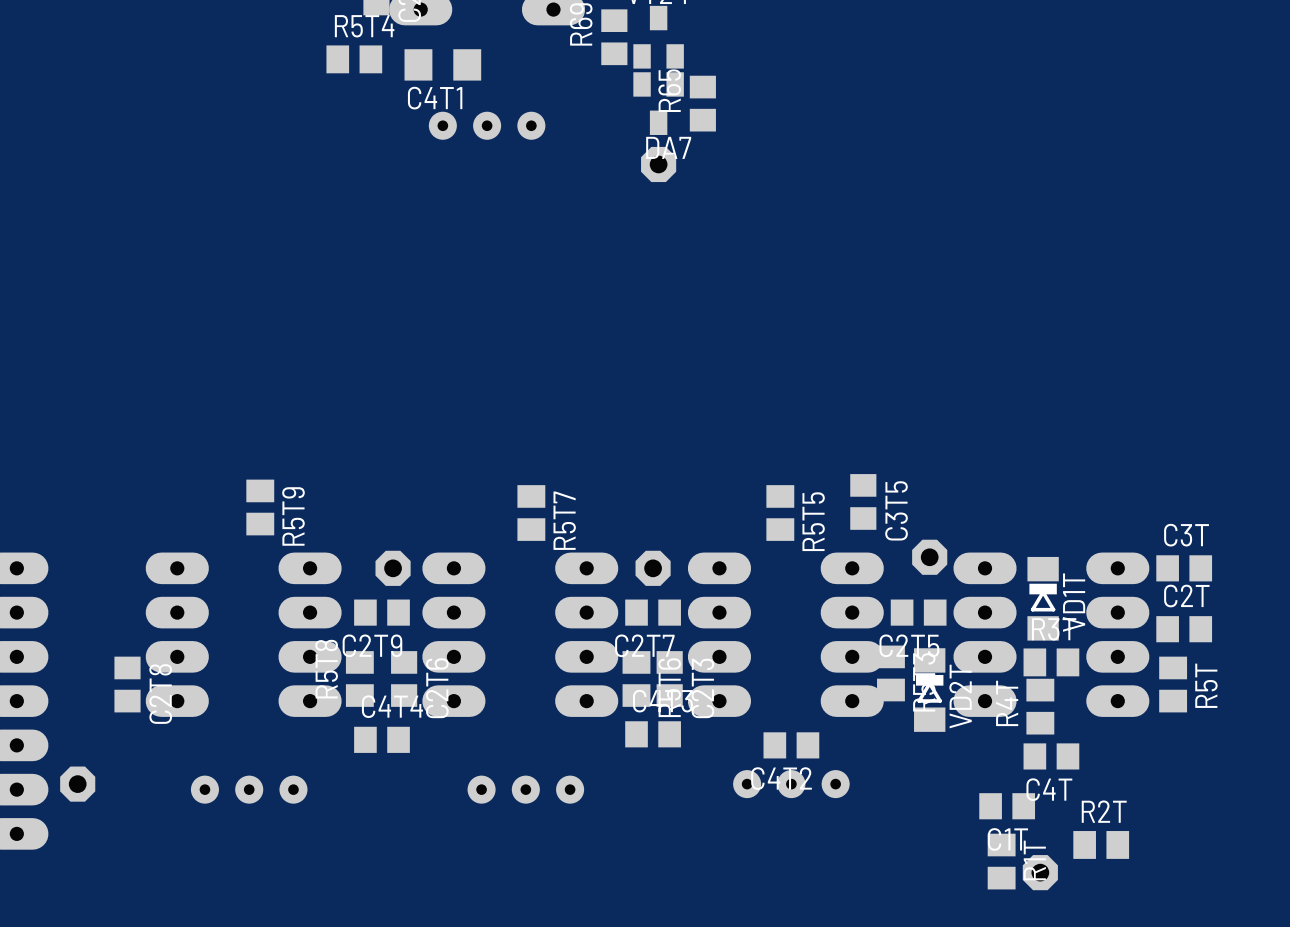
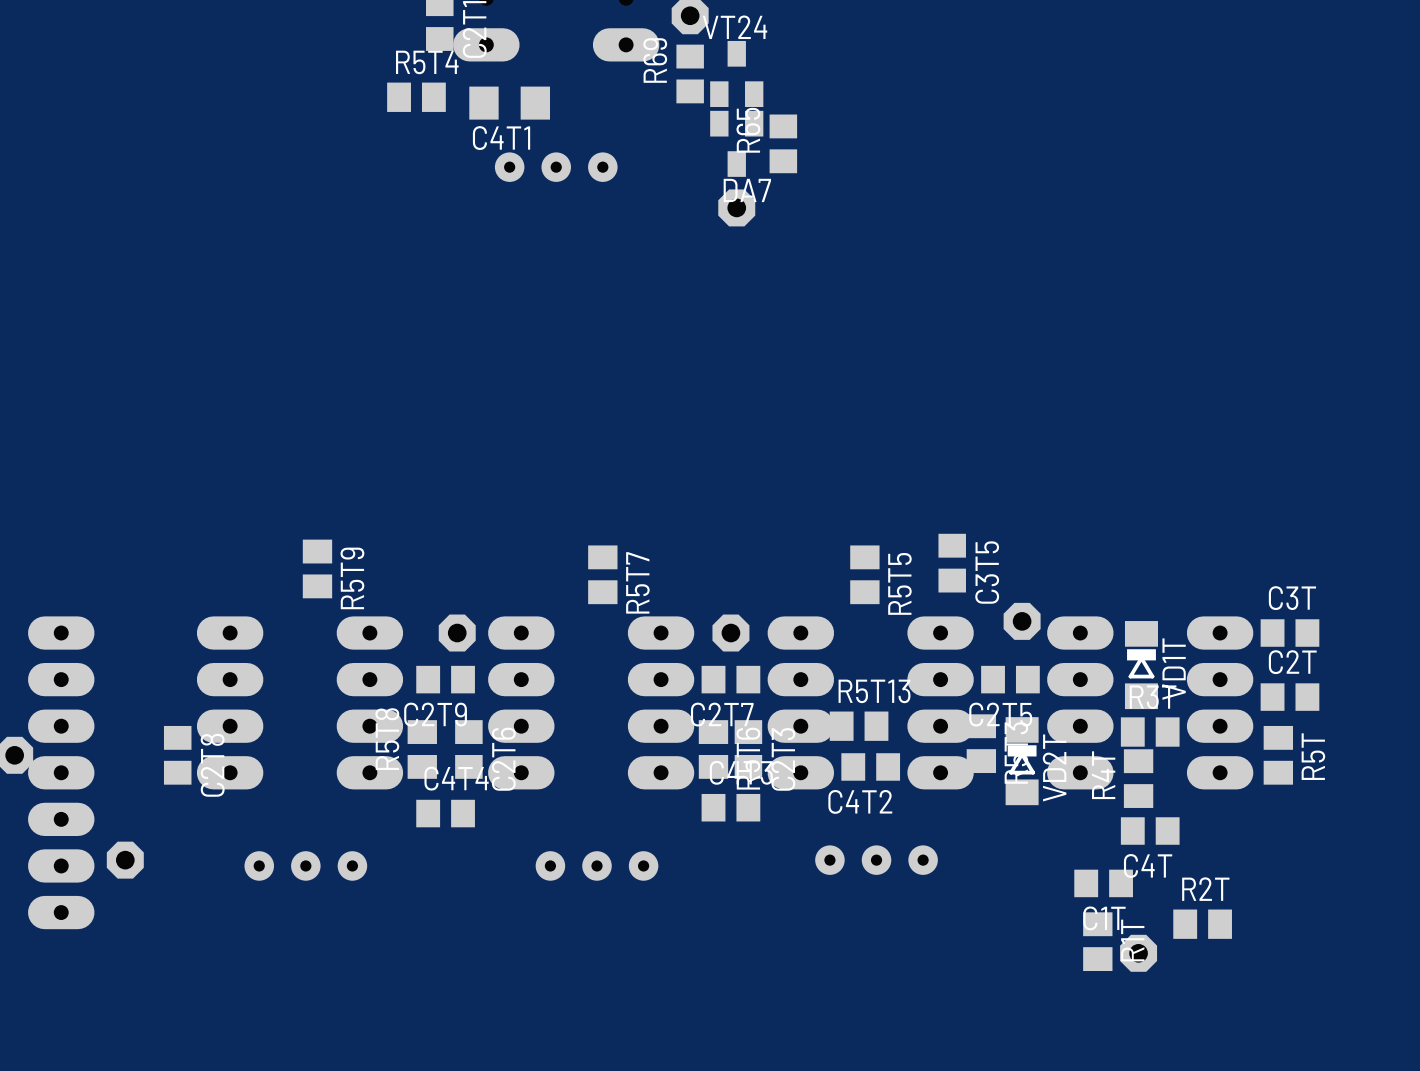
R5T13: none -> (859, 726)
C4T2 position: (791, 745) -> (870, 766)

